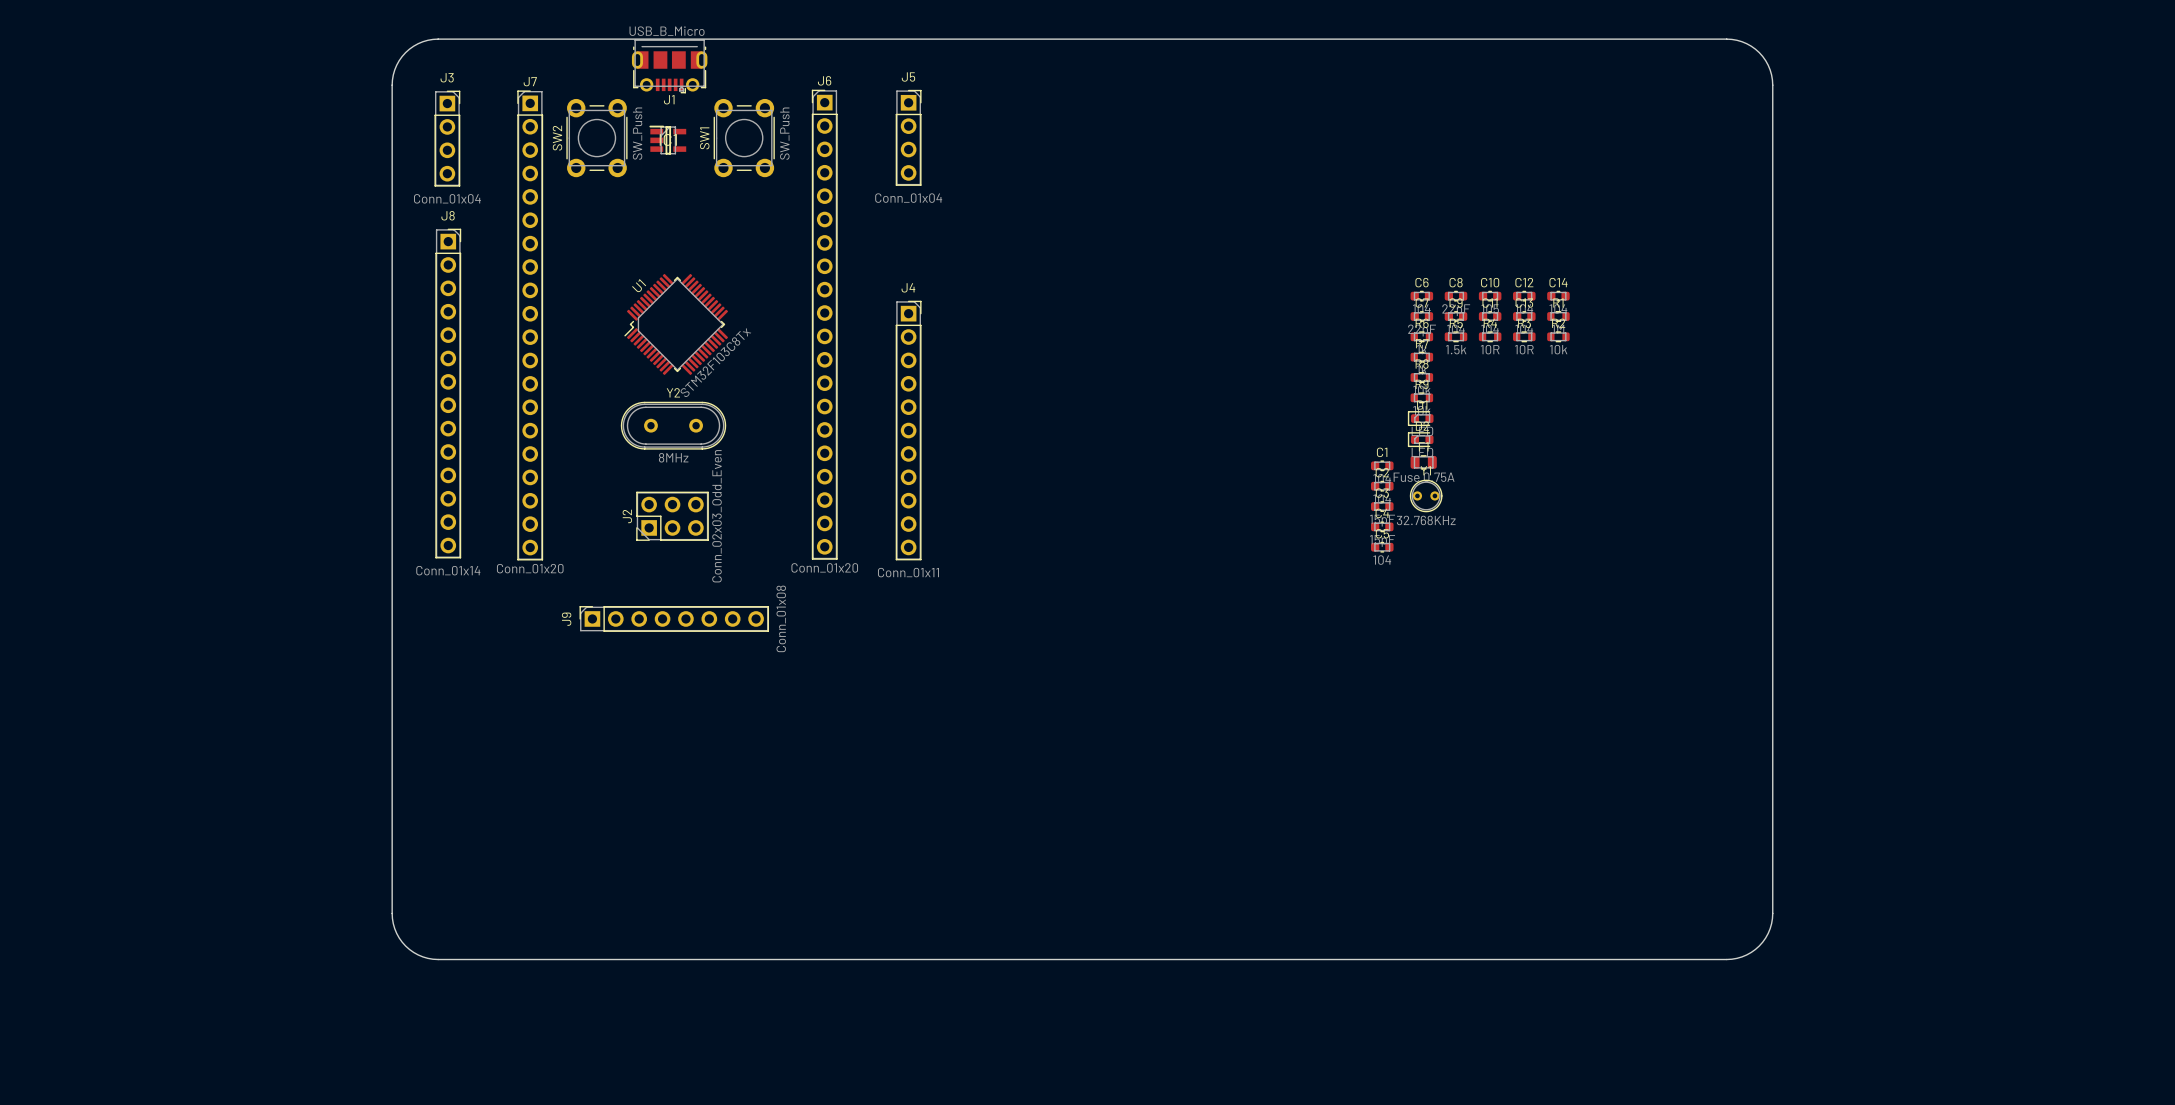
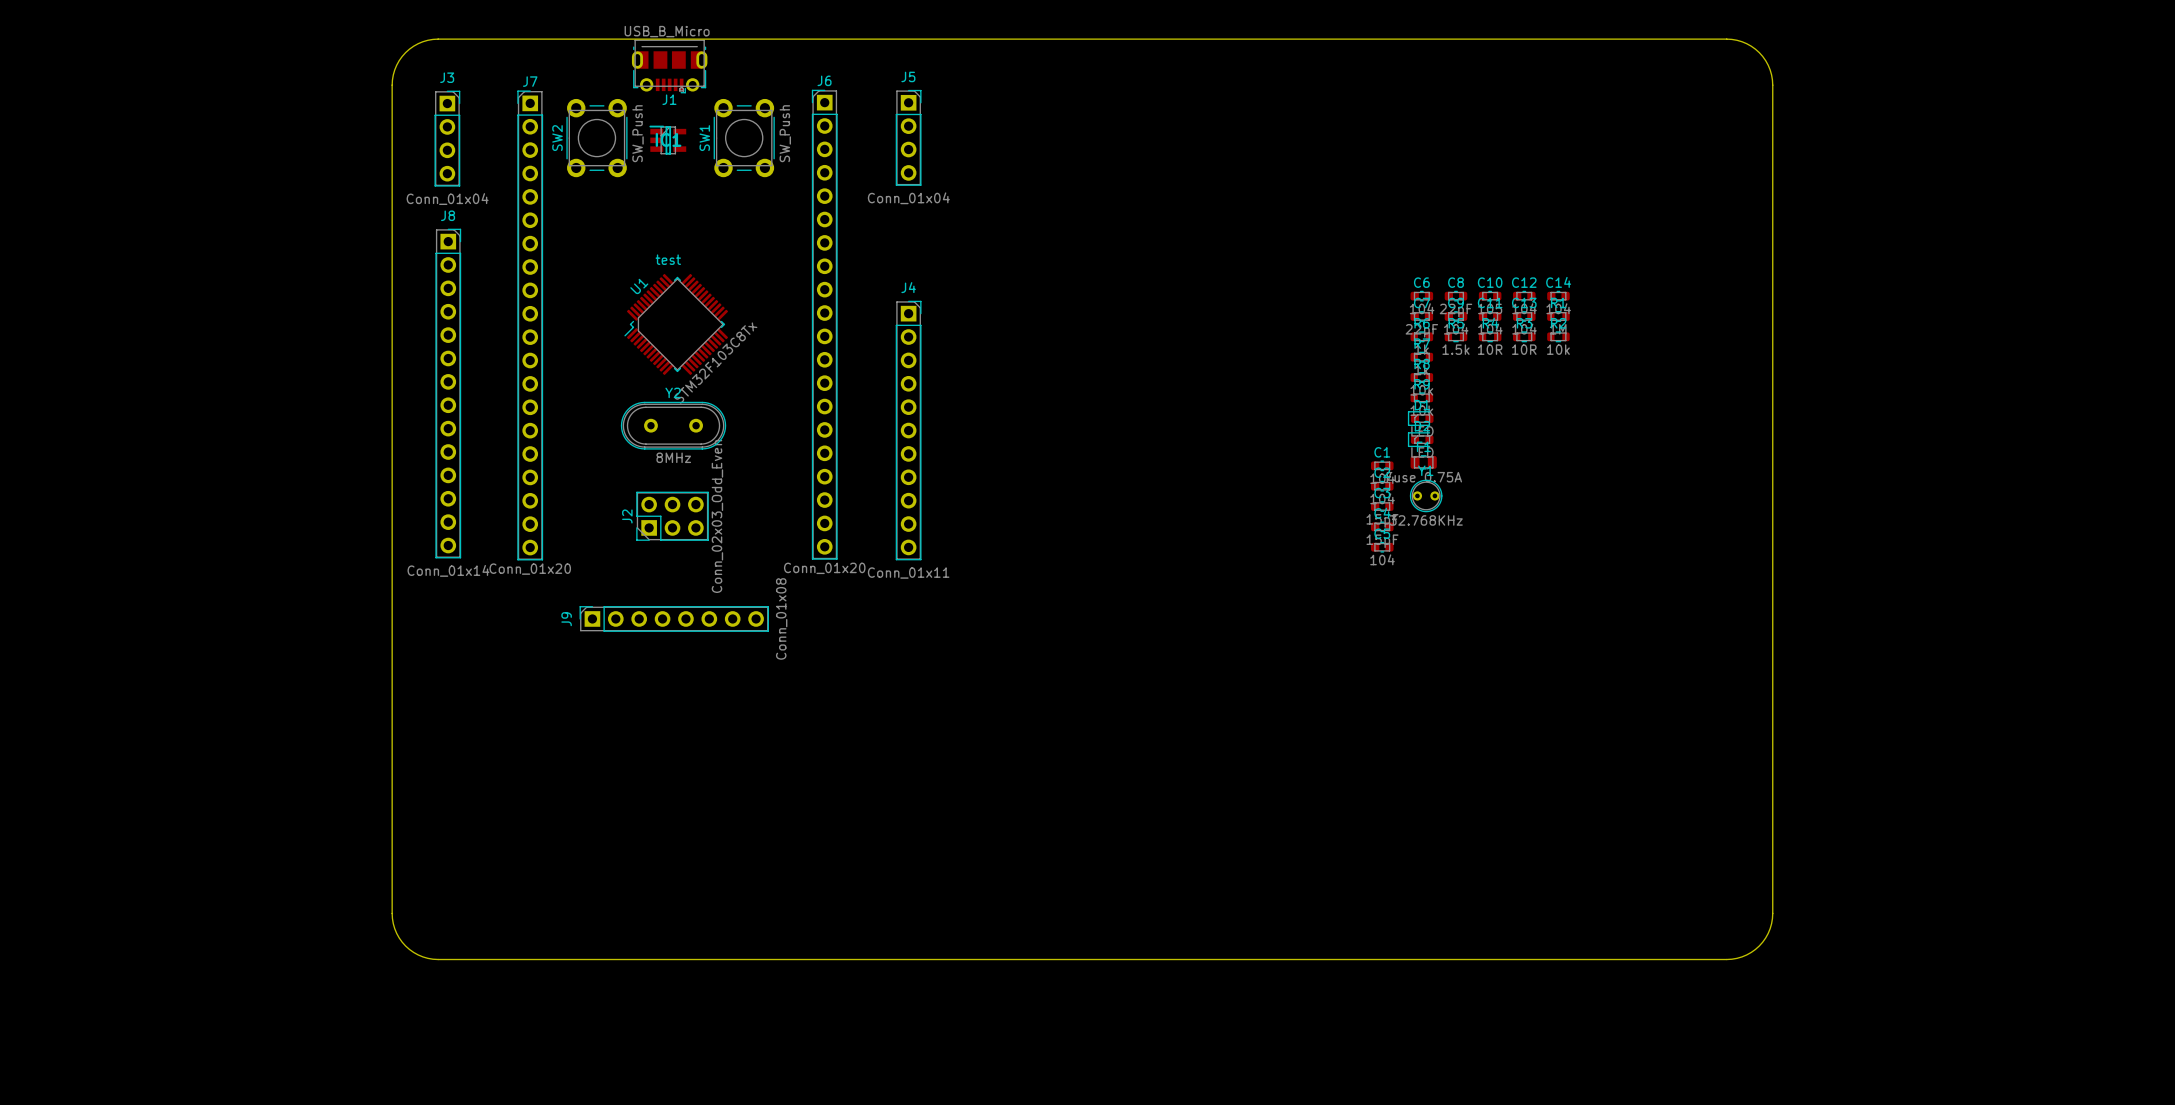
text: none -> test (668, 259)

